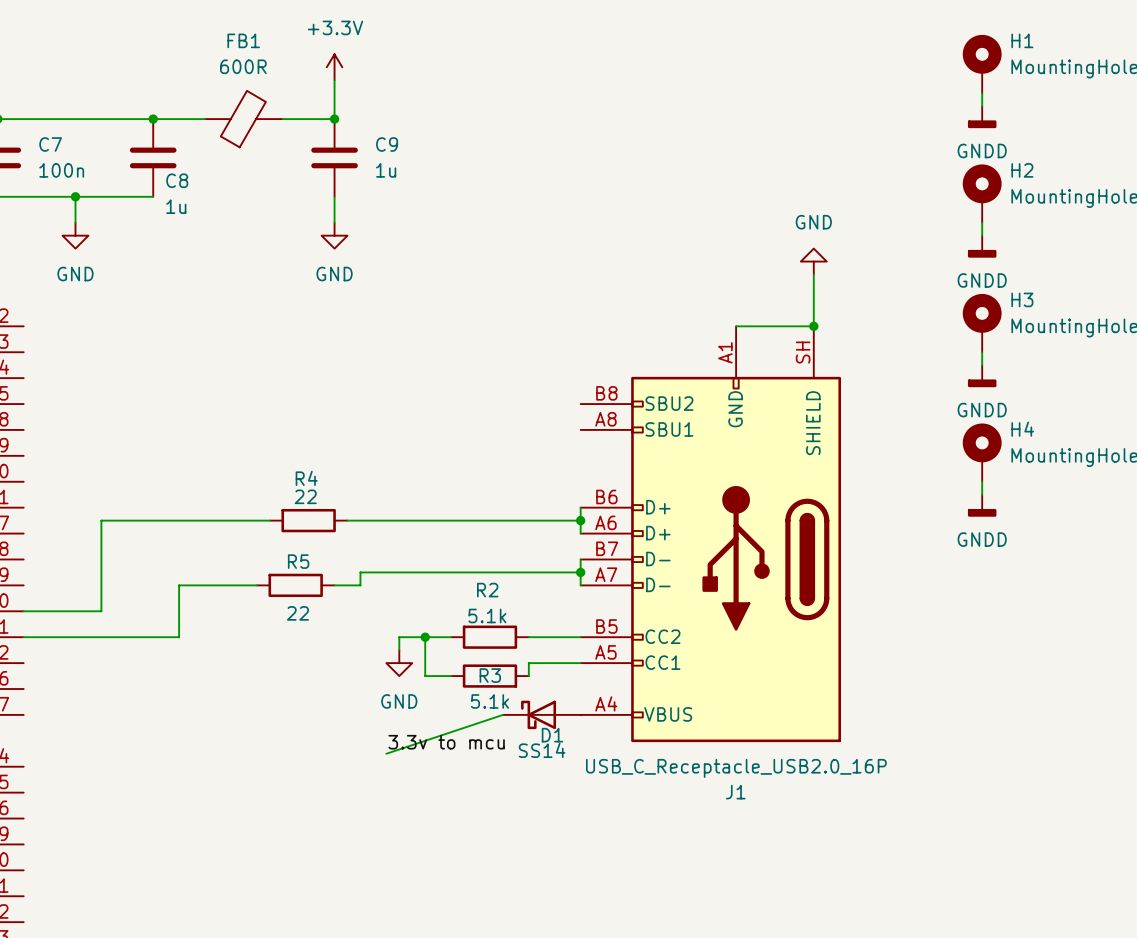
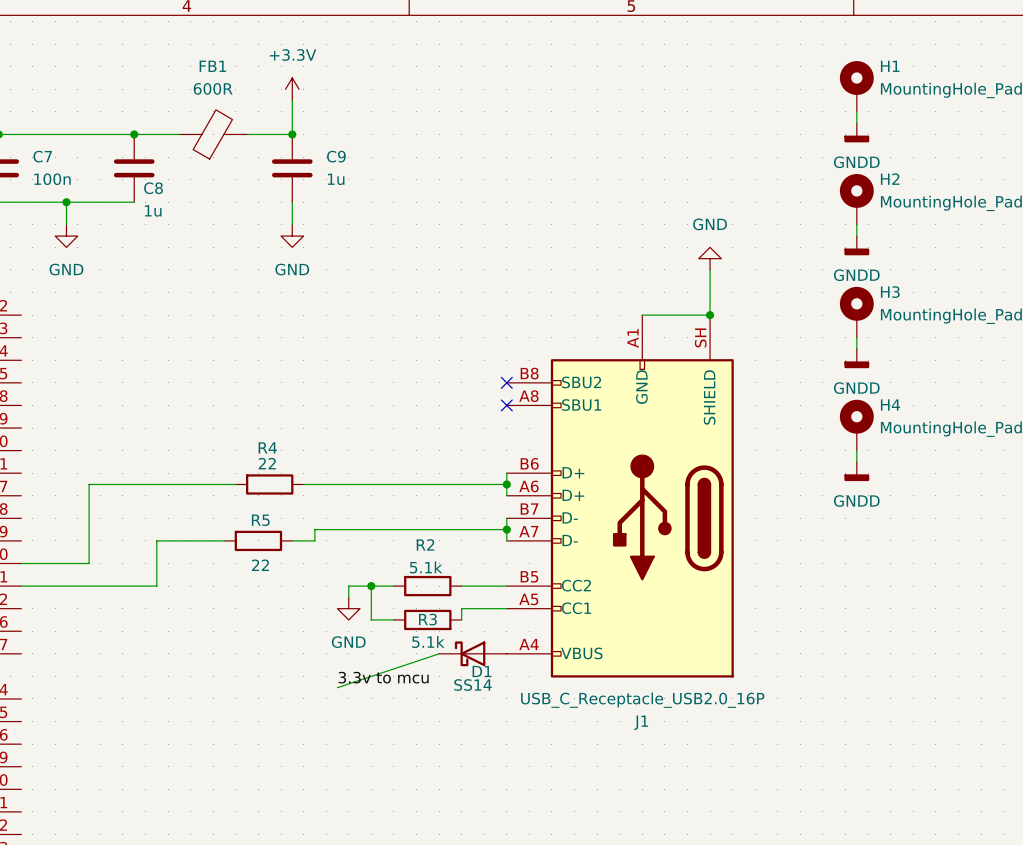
no-connect mark: none -> (506, 382)
no-connect mark: none -> (506, 405)

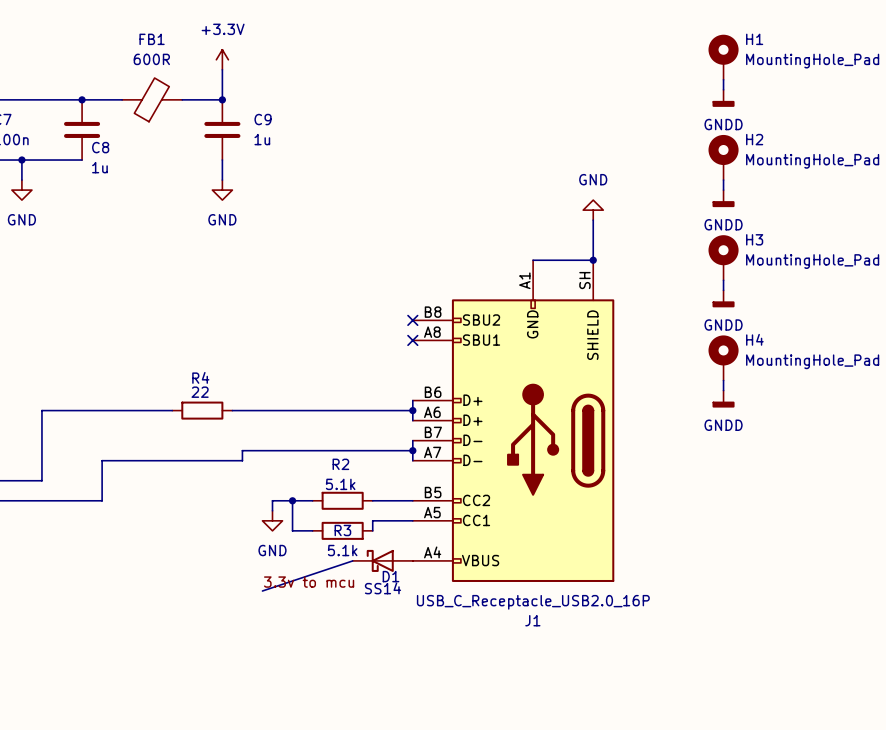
wire: none -> (162, 460) (222, 460)
R5: 22 (258, 540) -> none

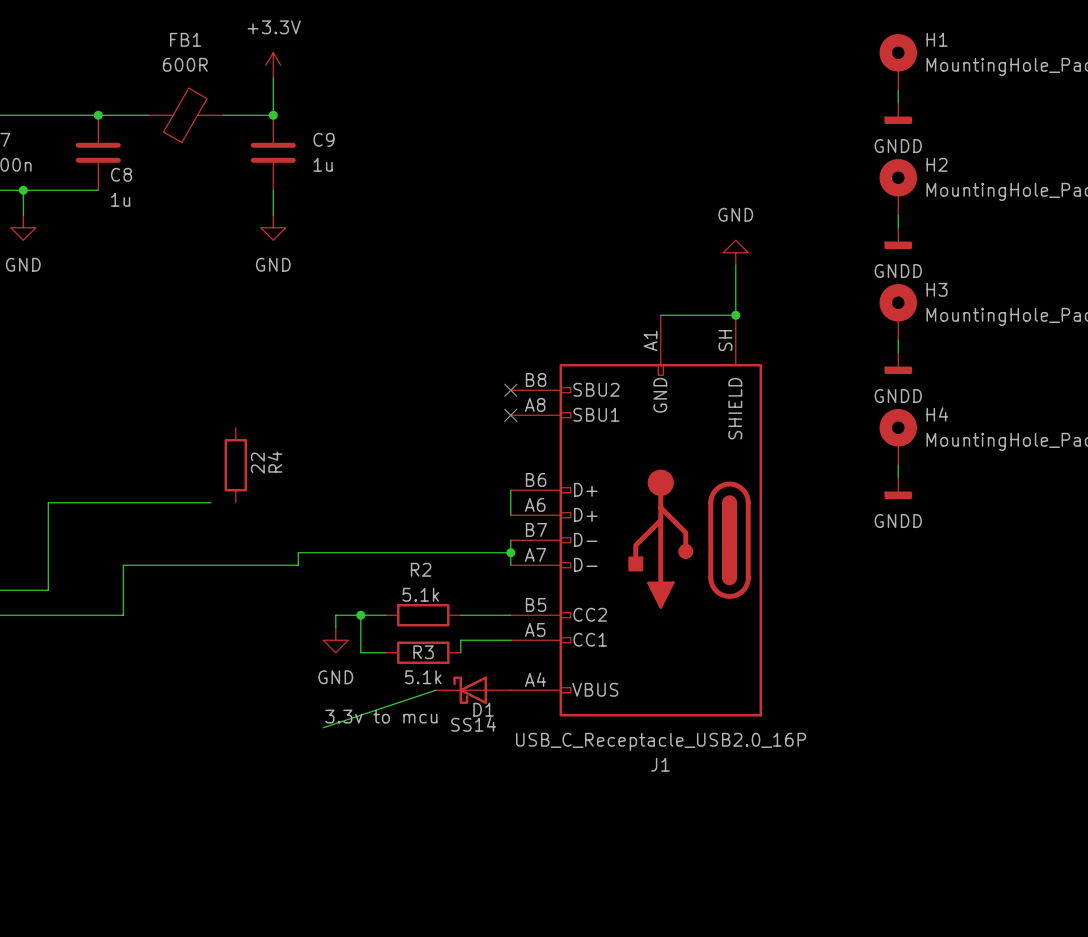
R4 rotation: 0° (202, 410) -> 90° clockwise (235, 465)
wire: (232, 410) (412, 410) -> none
junction: (412, 410) -> none

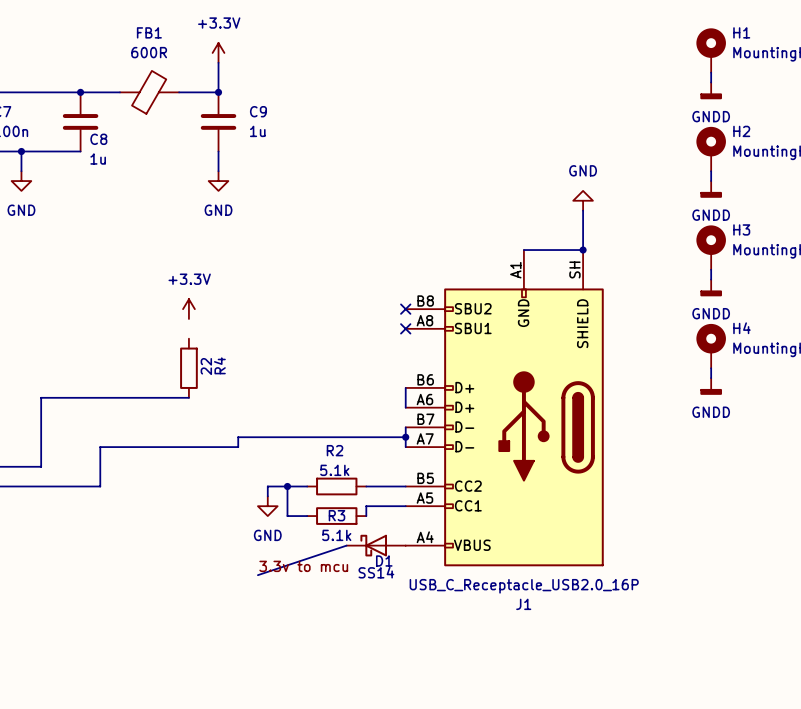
power symbol: none -> +3.3V (188, 309)
wire: none -> (169, 397) (188, 397)

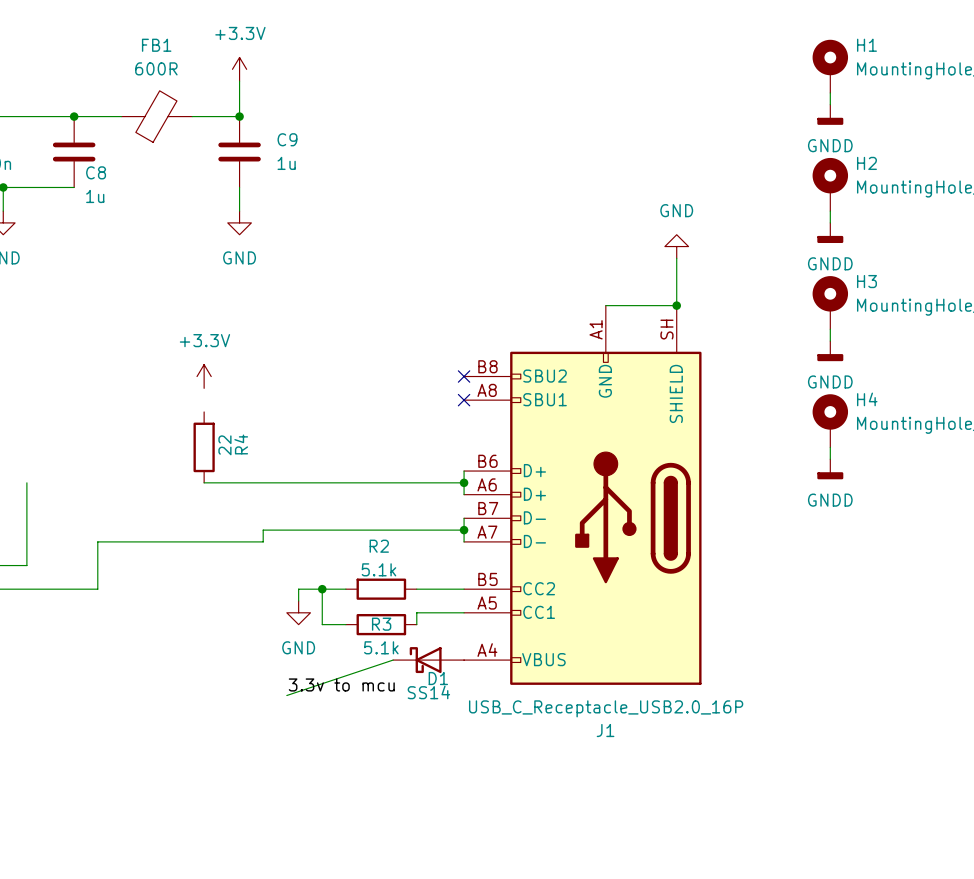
wire: (41, 397) (188, 397) -> (464, 482) (204, 482)
junction: none -> (464, 482)

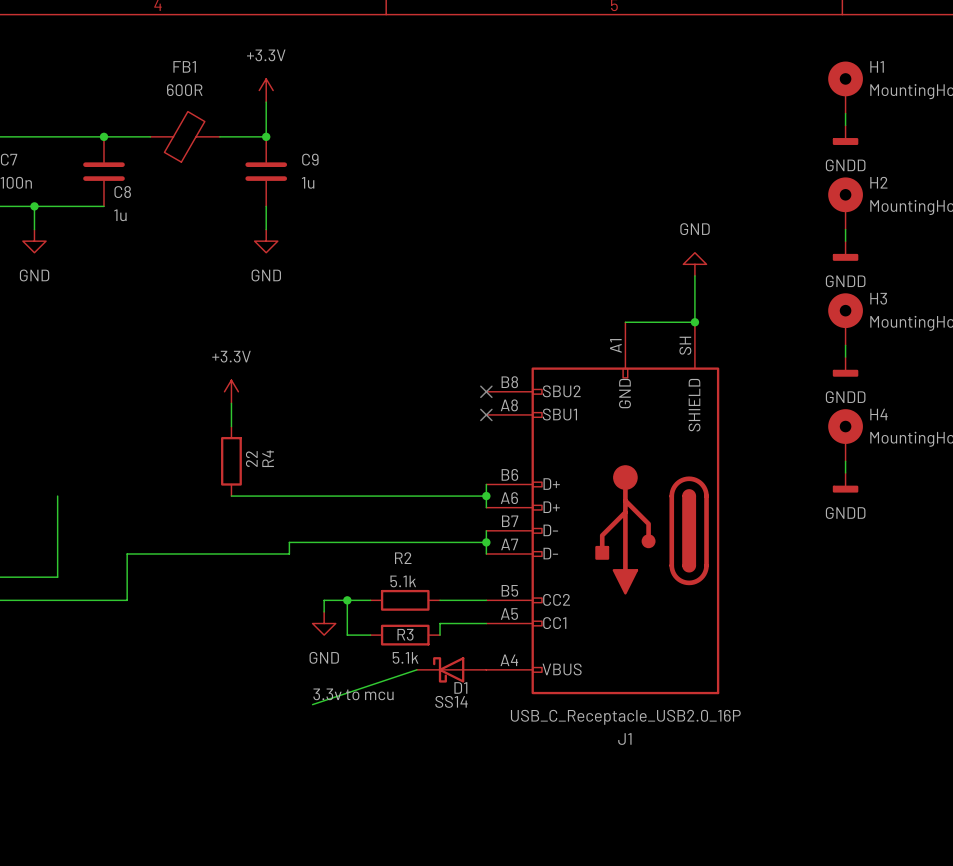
wire: none -> (231, 403) (231, 426)

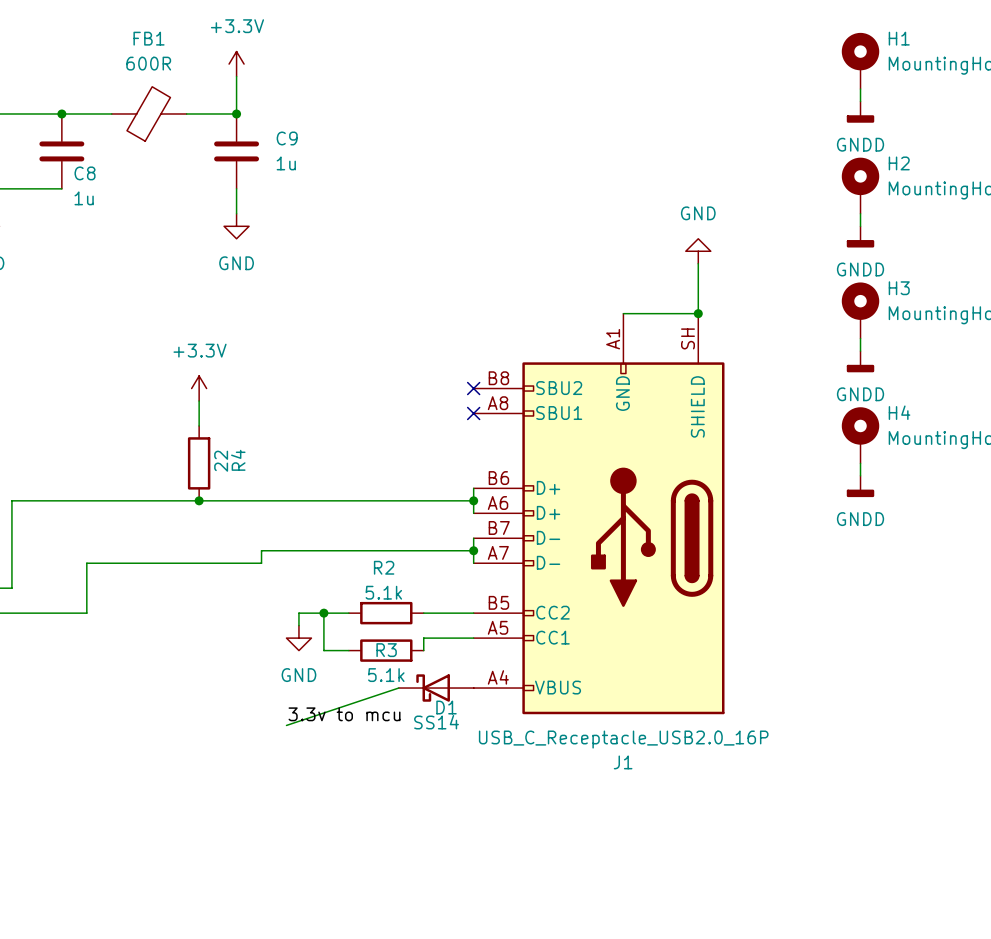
wire: none -> (11, 500) (199, 500)
junction: none -> (199, 500)

